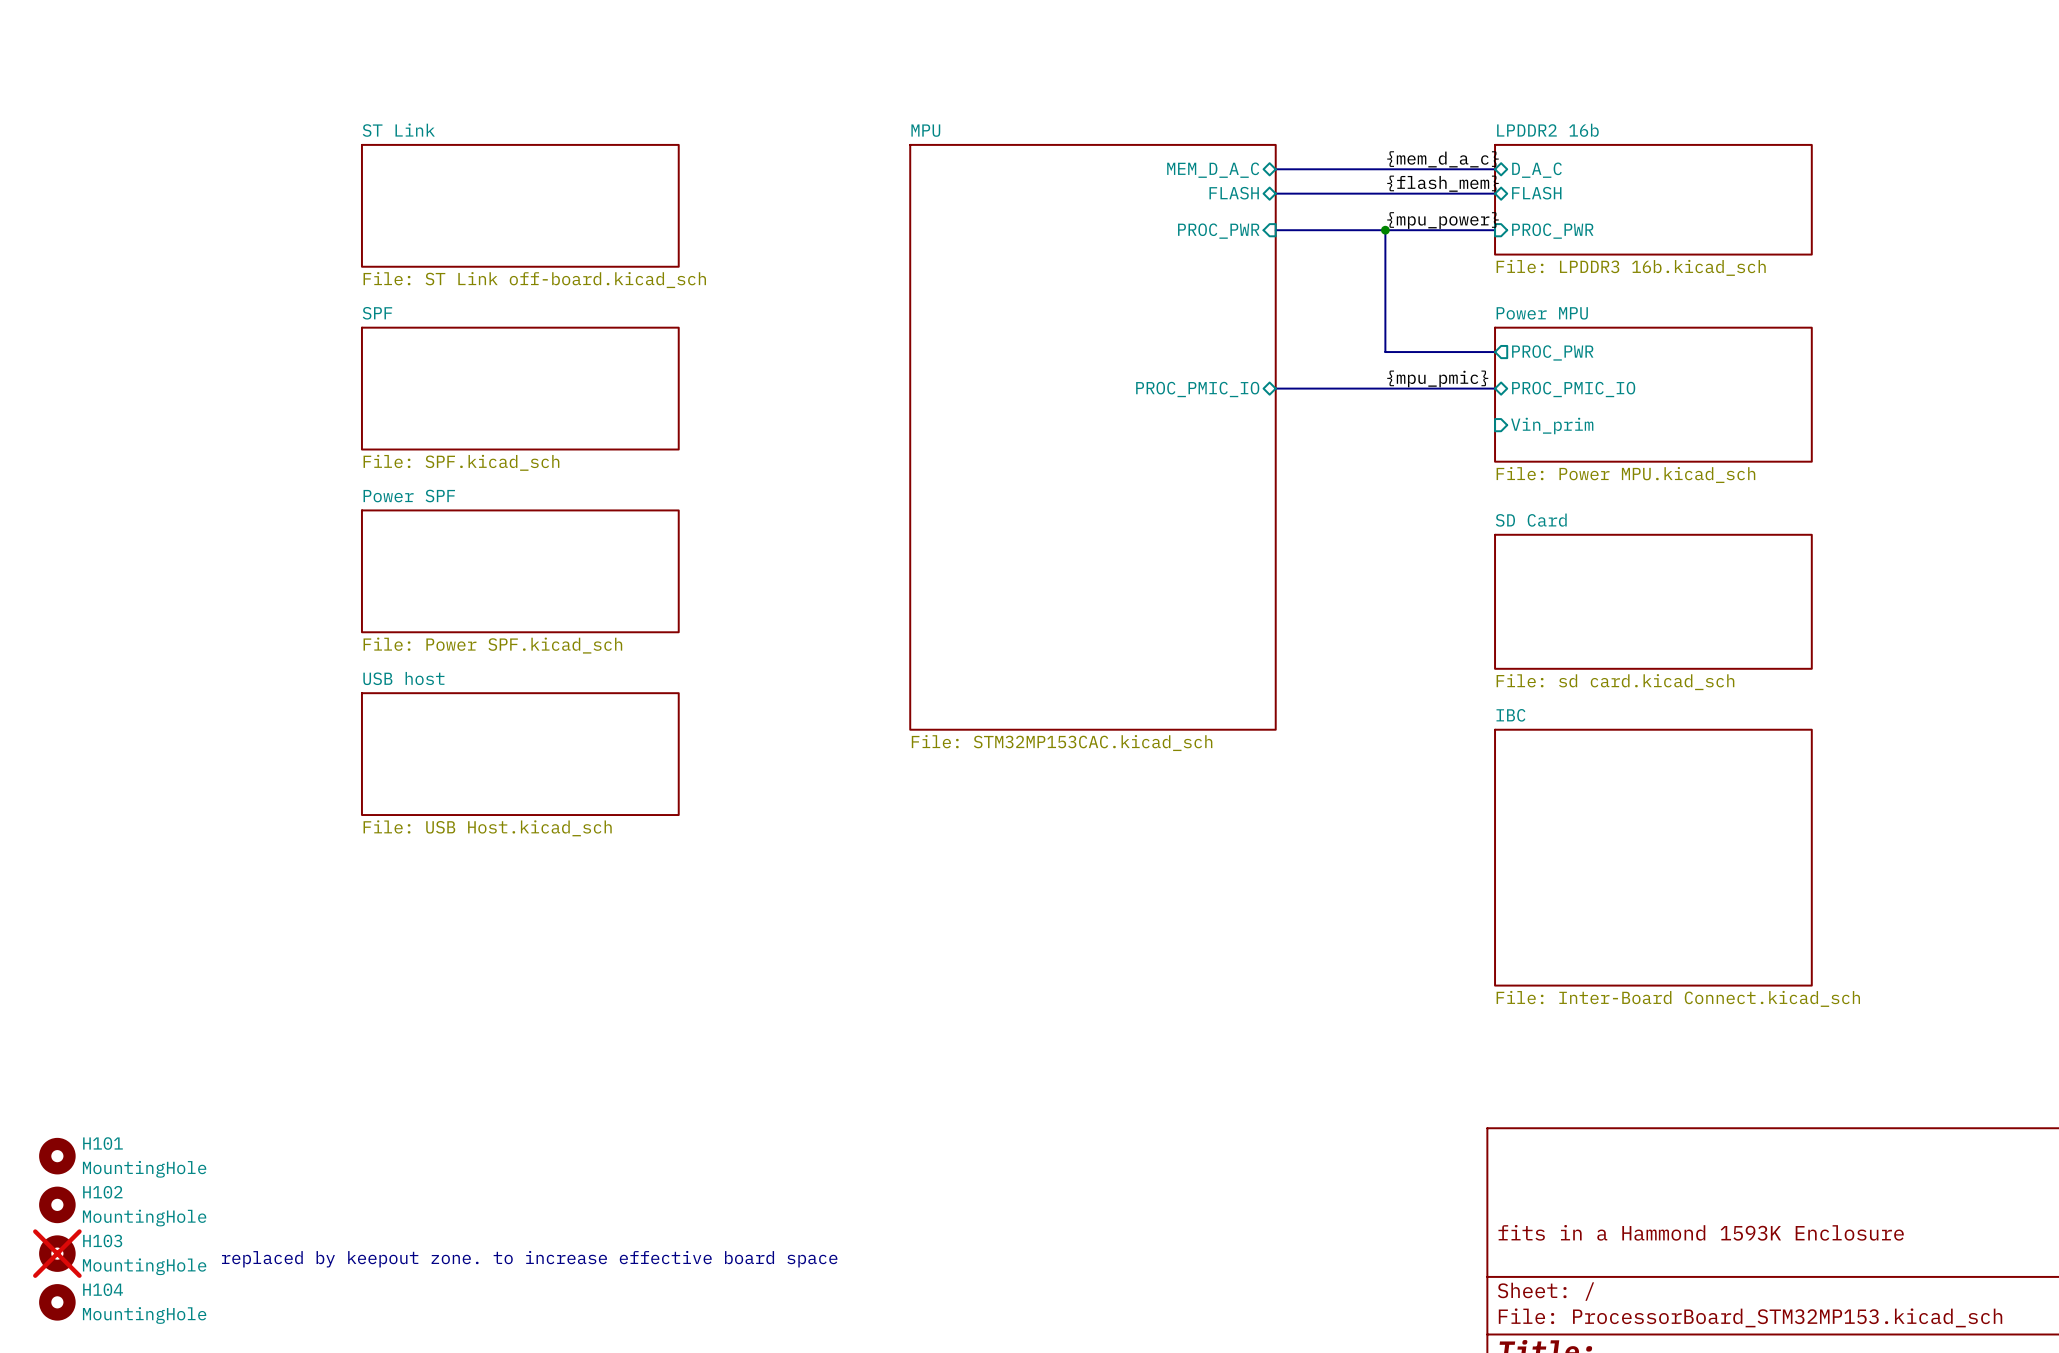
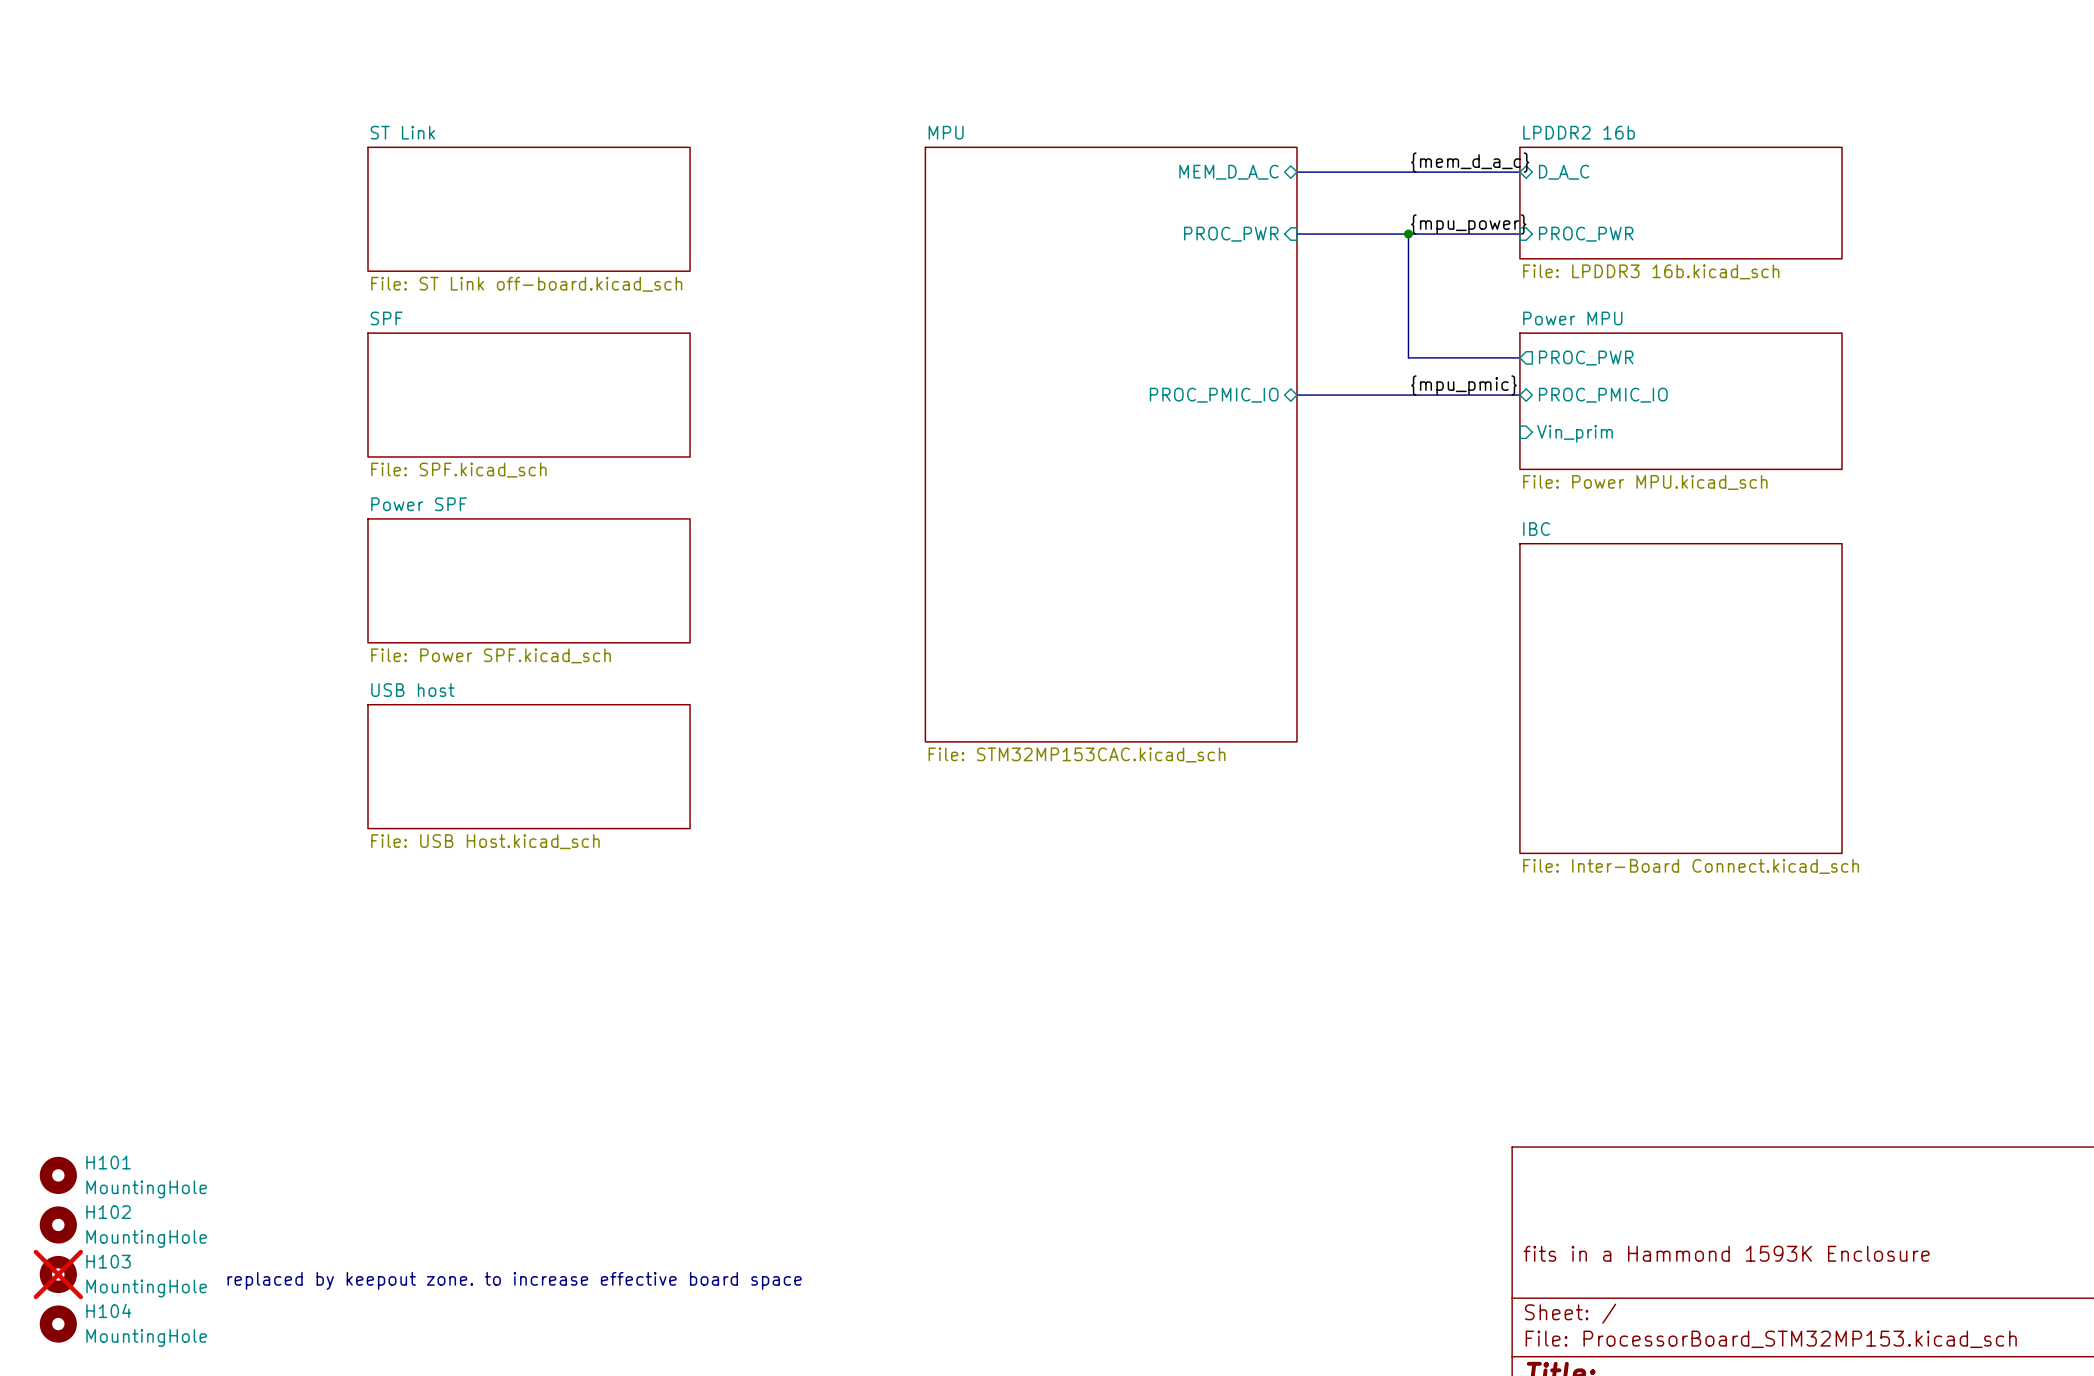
label: {flash_mem} (1442, 183) -> none
sheet pin: FLASH (1234, 193) -> none
bus: (1275, 193) (1495, 193) -> none
sheet pin: FLASH (1536, 193) -> none
sheet SD Card: File: sd card.kicad_sch (1653, 601) -> none
sheet IBC: none -> File: Inter-Board Connect.kicad_sch (1680, 698)
sheet IBC: File: Inter-Board Connect.kicad_sch (1653, 857) -> none

